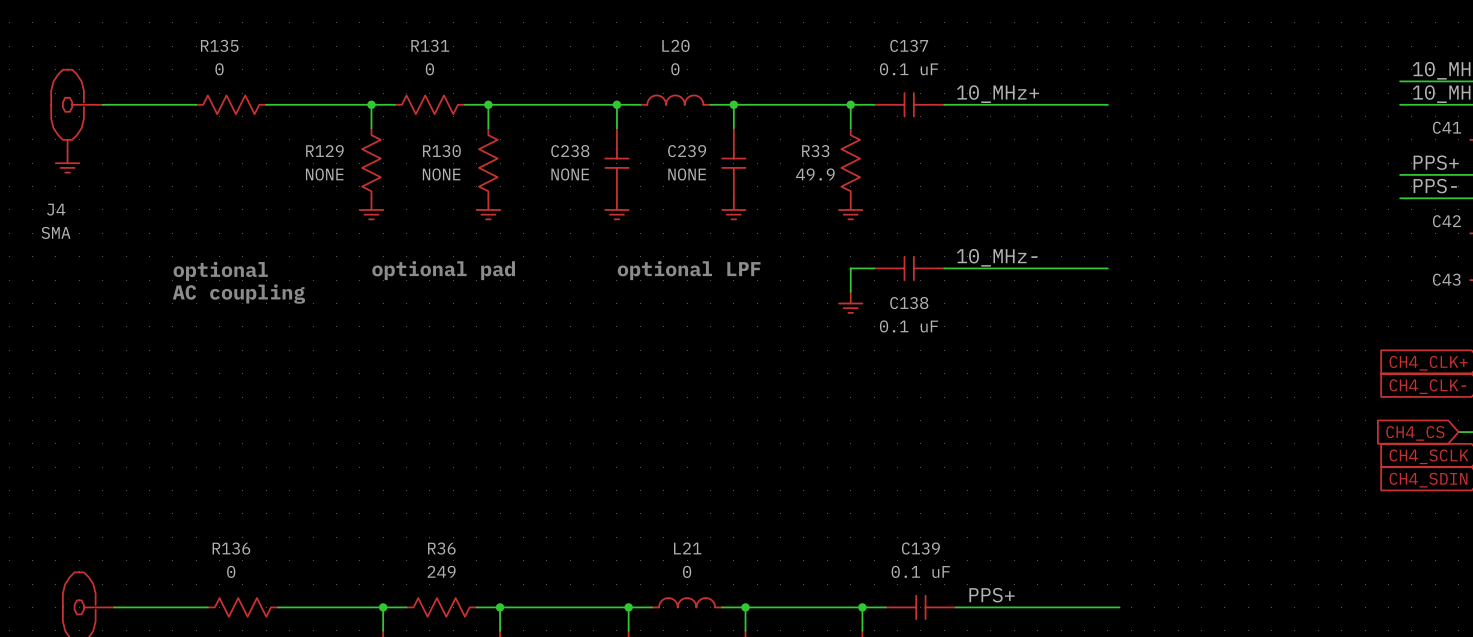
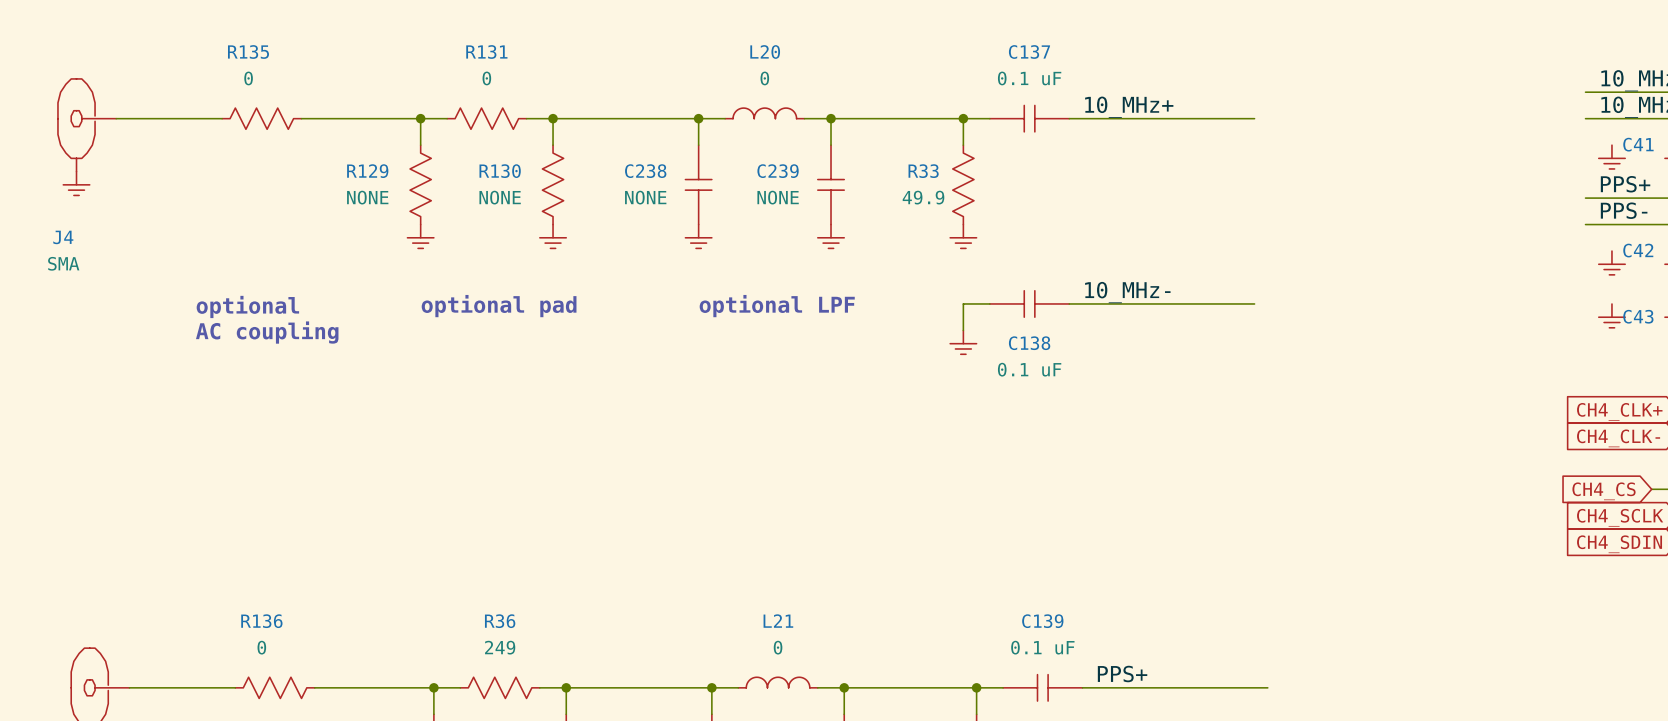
power symbol: none -> (1611, 157)
power symbol: none -> (1611, 262)
power symbol: none -> (1611, 315)

